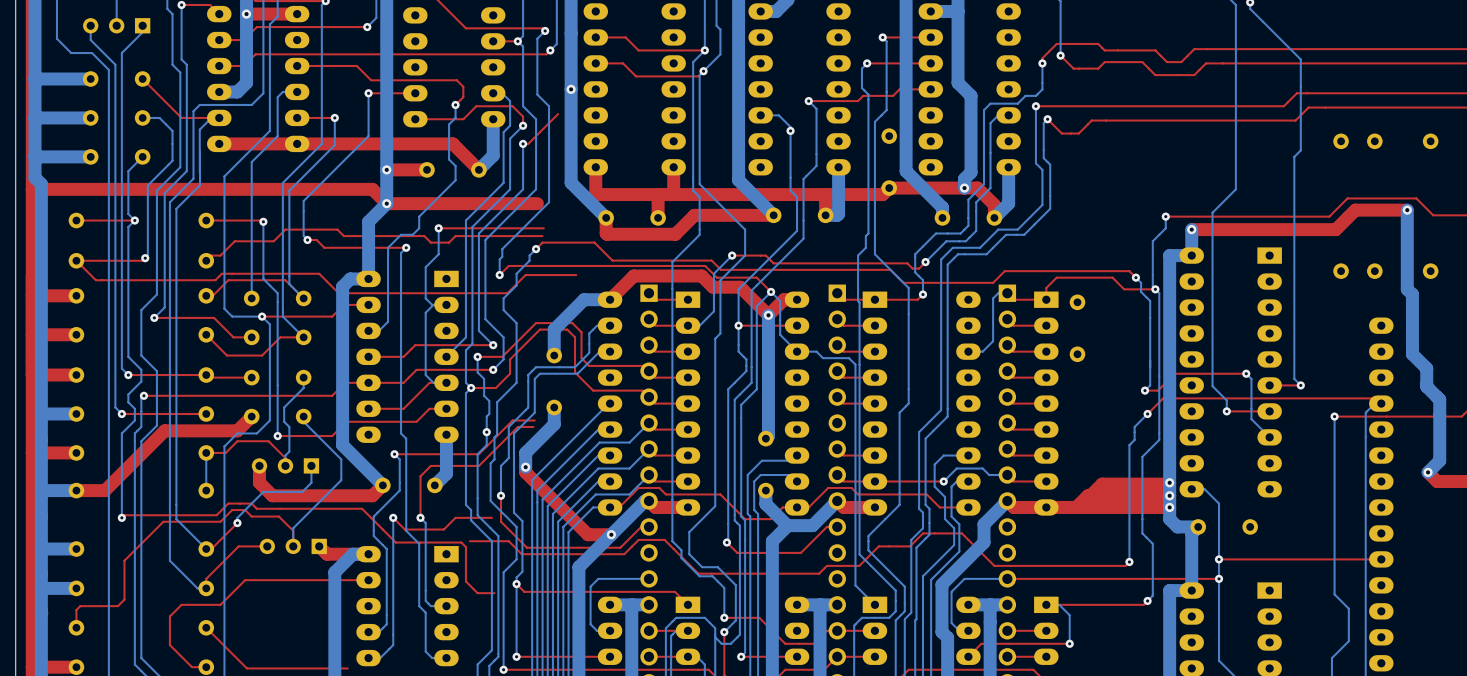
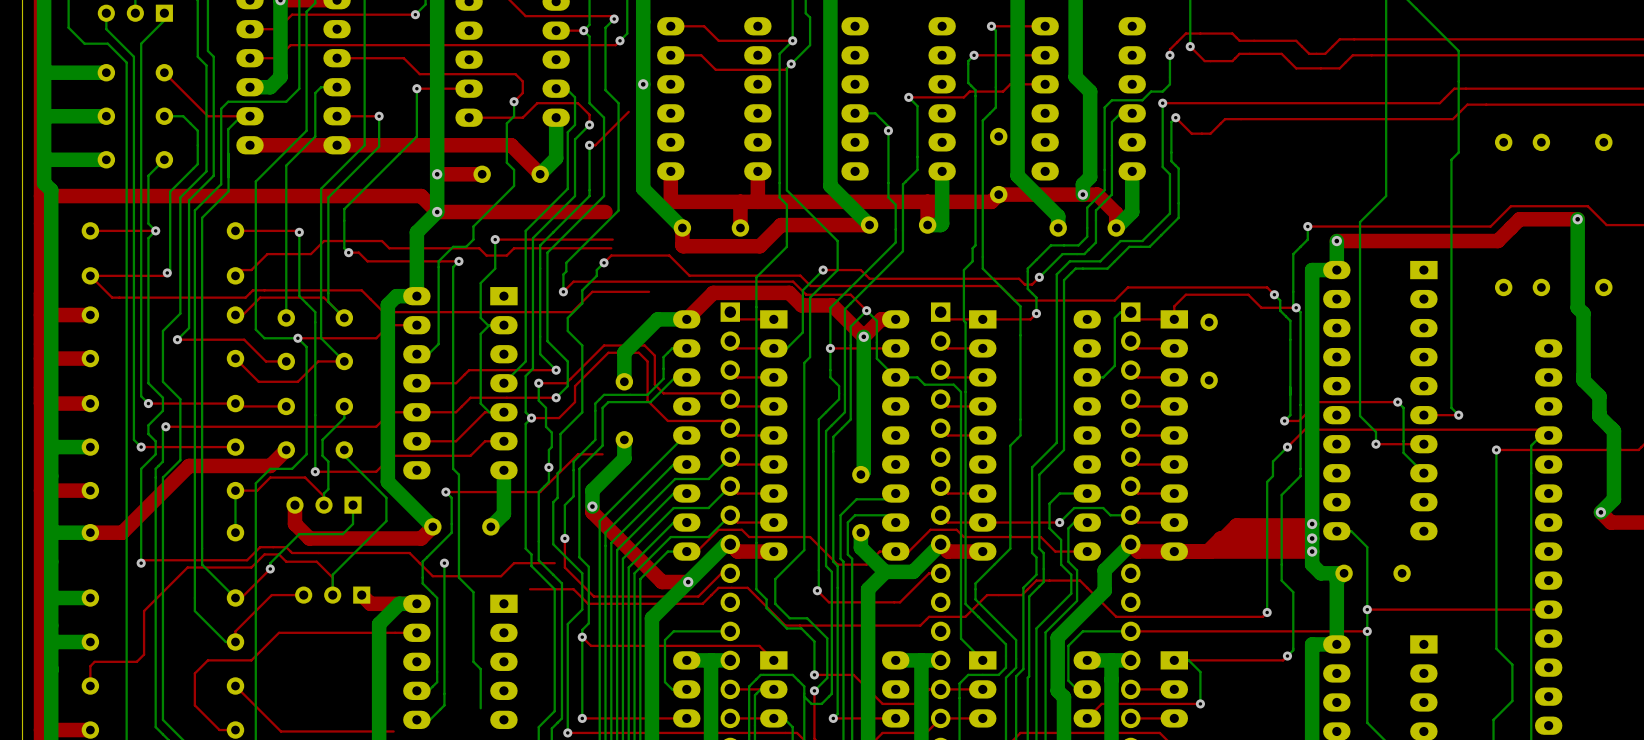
top track: (533, 426) (517, 426) (478, 465) (430, 465) (420, 476) (420, 517) -> none
top track: (393, 517) (404, 529) -> (432, 576) (457, 576)
bottom track: (420, 517) (425, 523) (425, 600) (430, 606) (446, 606) -> none
via: (420, 517) -> none
top track: (382, 529) (395, 542) (461, 542) (465, 547) (465, 581) (477, 593) (494, 593) -> none
bottom track: (425, 647) (425, 651) (432, 658) (446, 658) -> none

